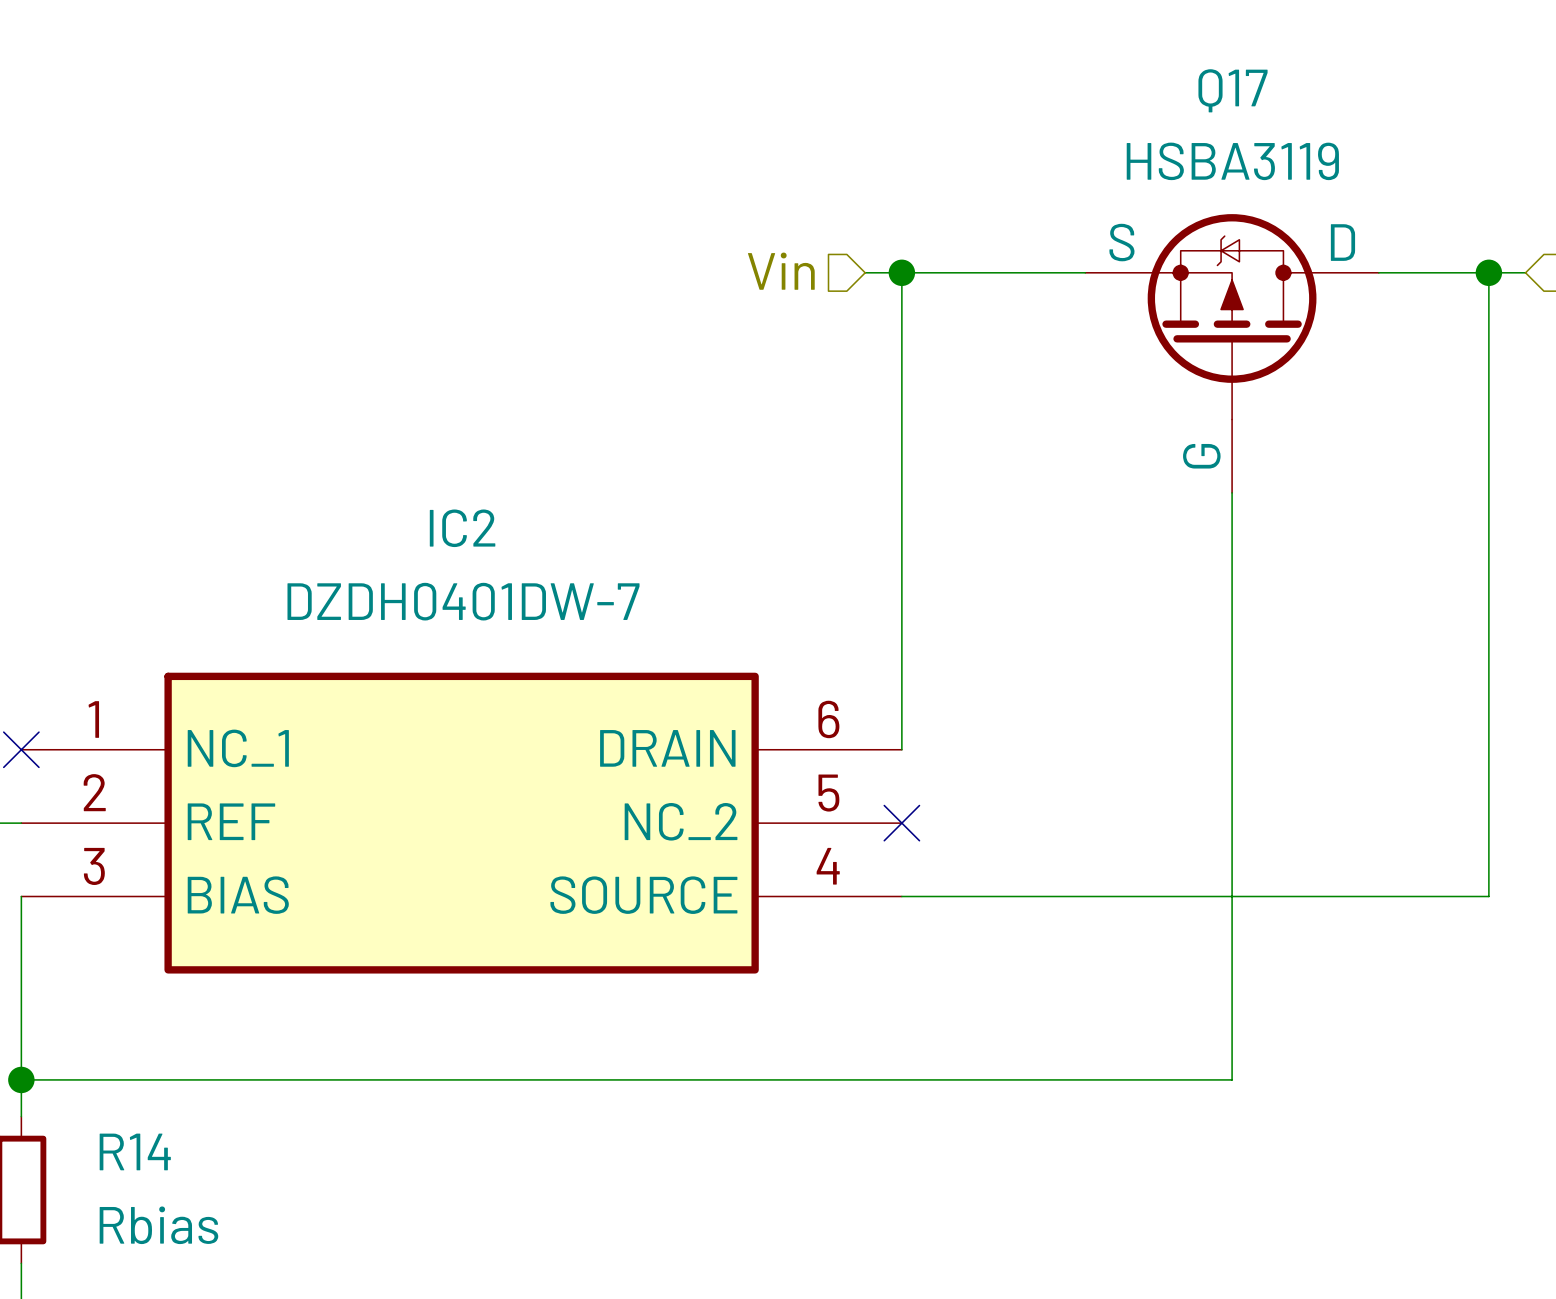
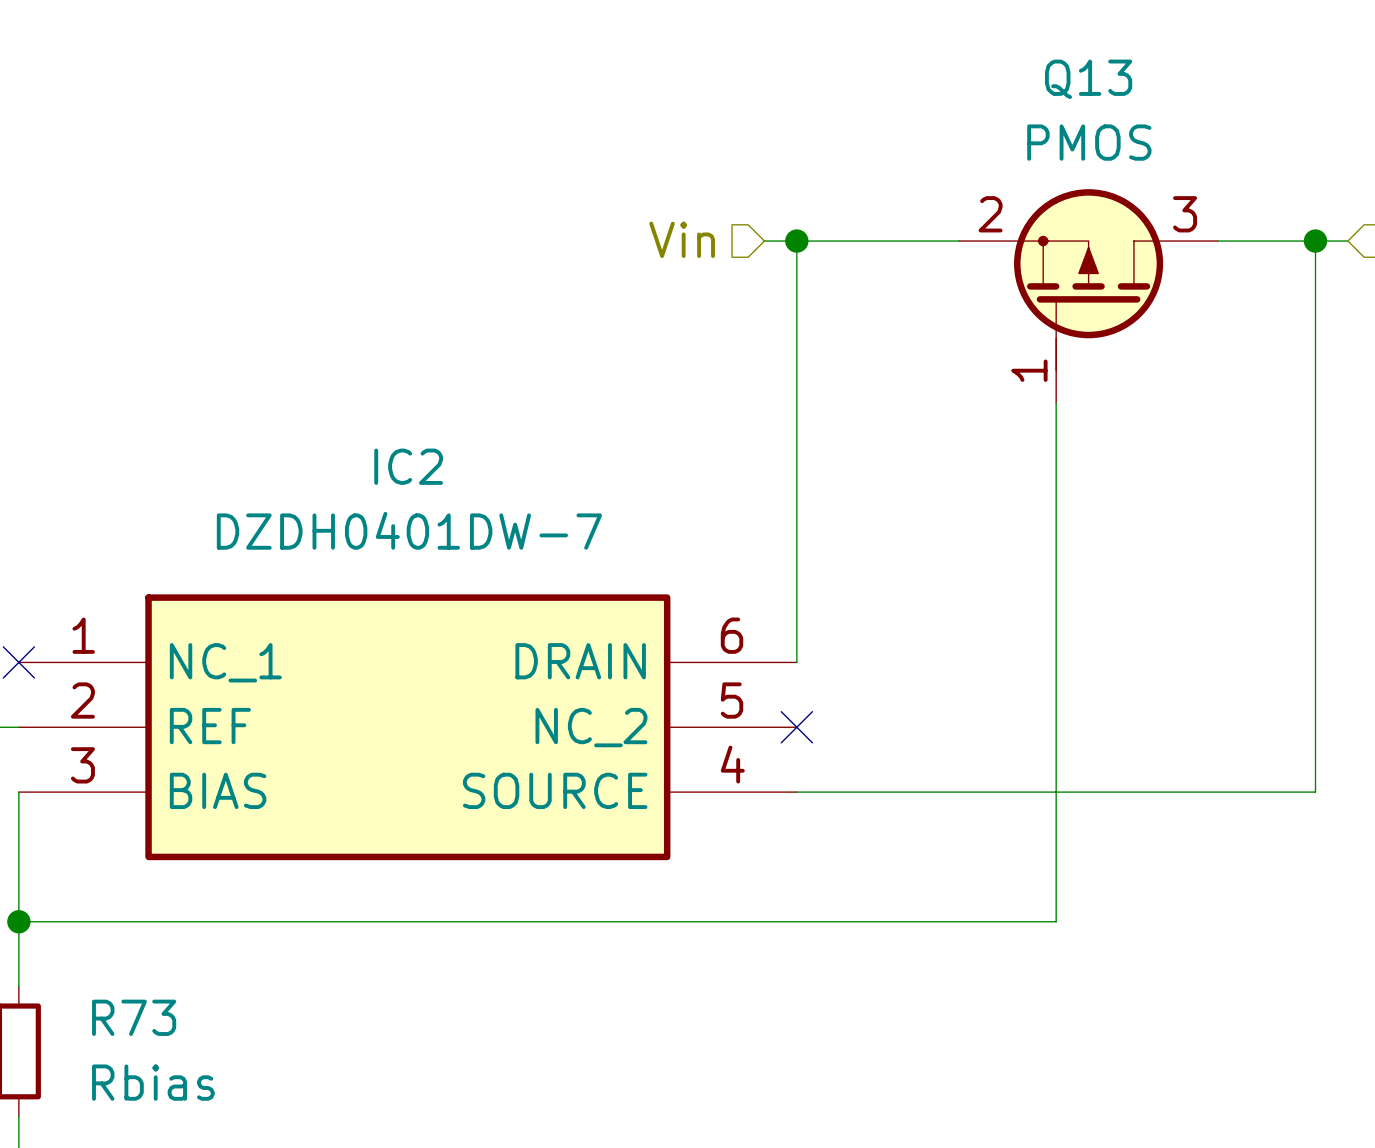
Q13: none -> PMOS (1088, 296)
Q17: HSBA3119 (1232, 353) -> none
wire: none -> (1056, 403) (1056, 921) (18, 921)
wire: (1232, 492) (1232, 1079) (21, 1079) -> none
junction position: (21, 1079) -> (18, 921)
R14 name: R14 (135, 1151) -> R73 (134, 1017)

